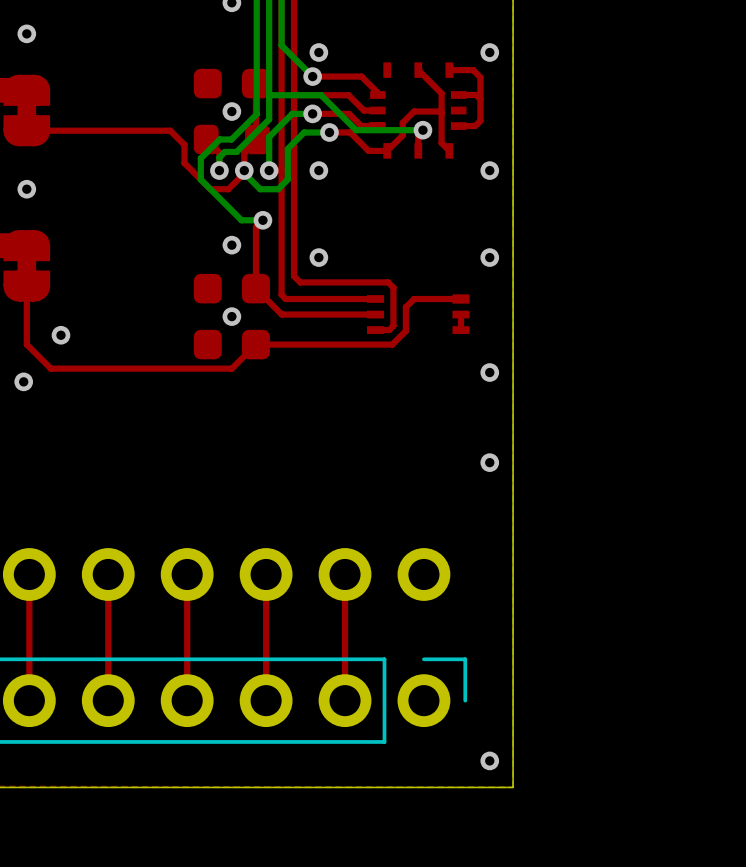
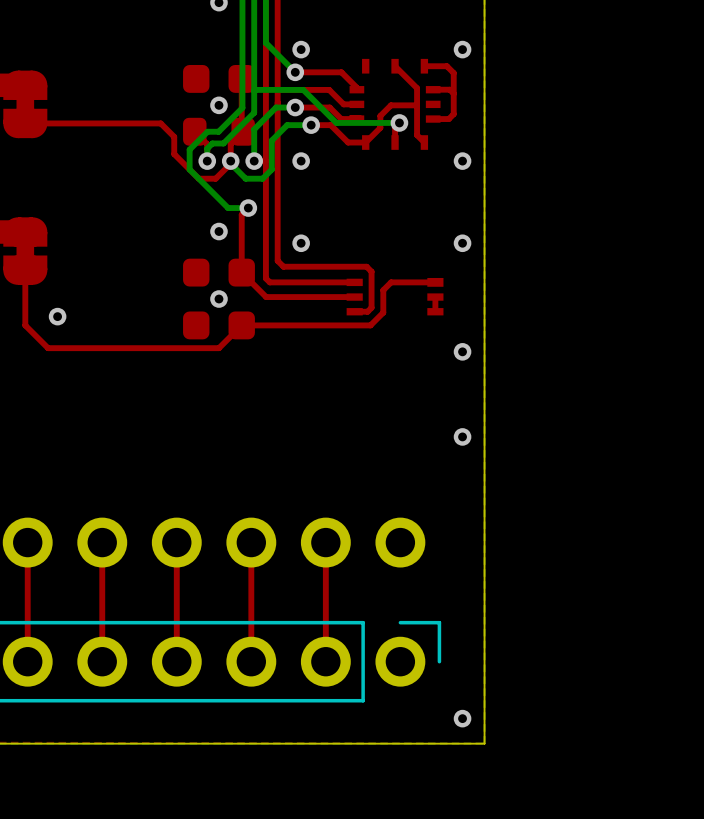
via: (26, 33) -> none
via: (26, 189) -> none
via: (23, 381) -> none

